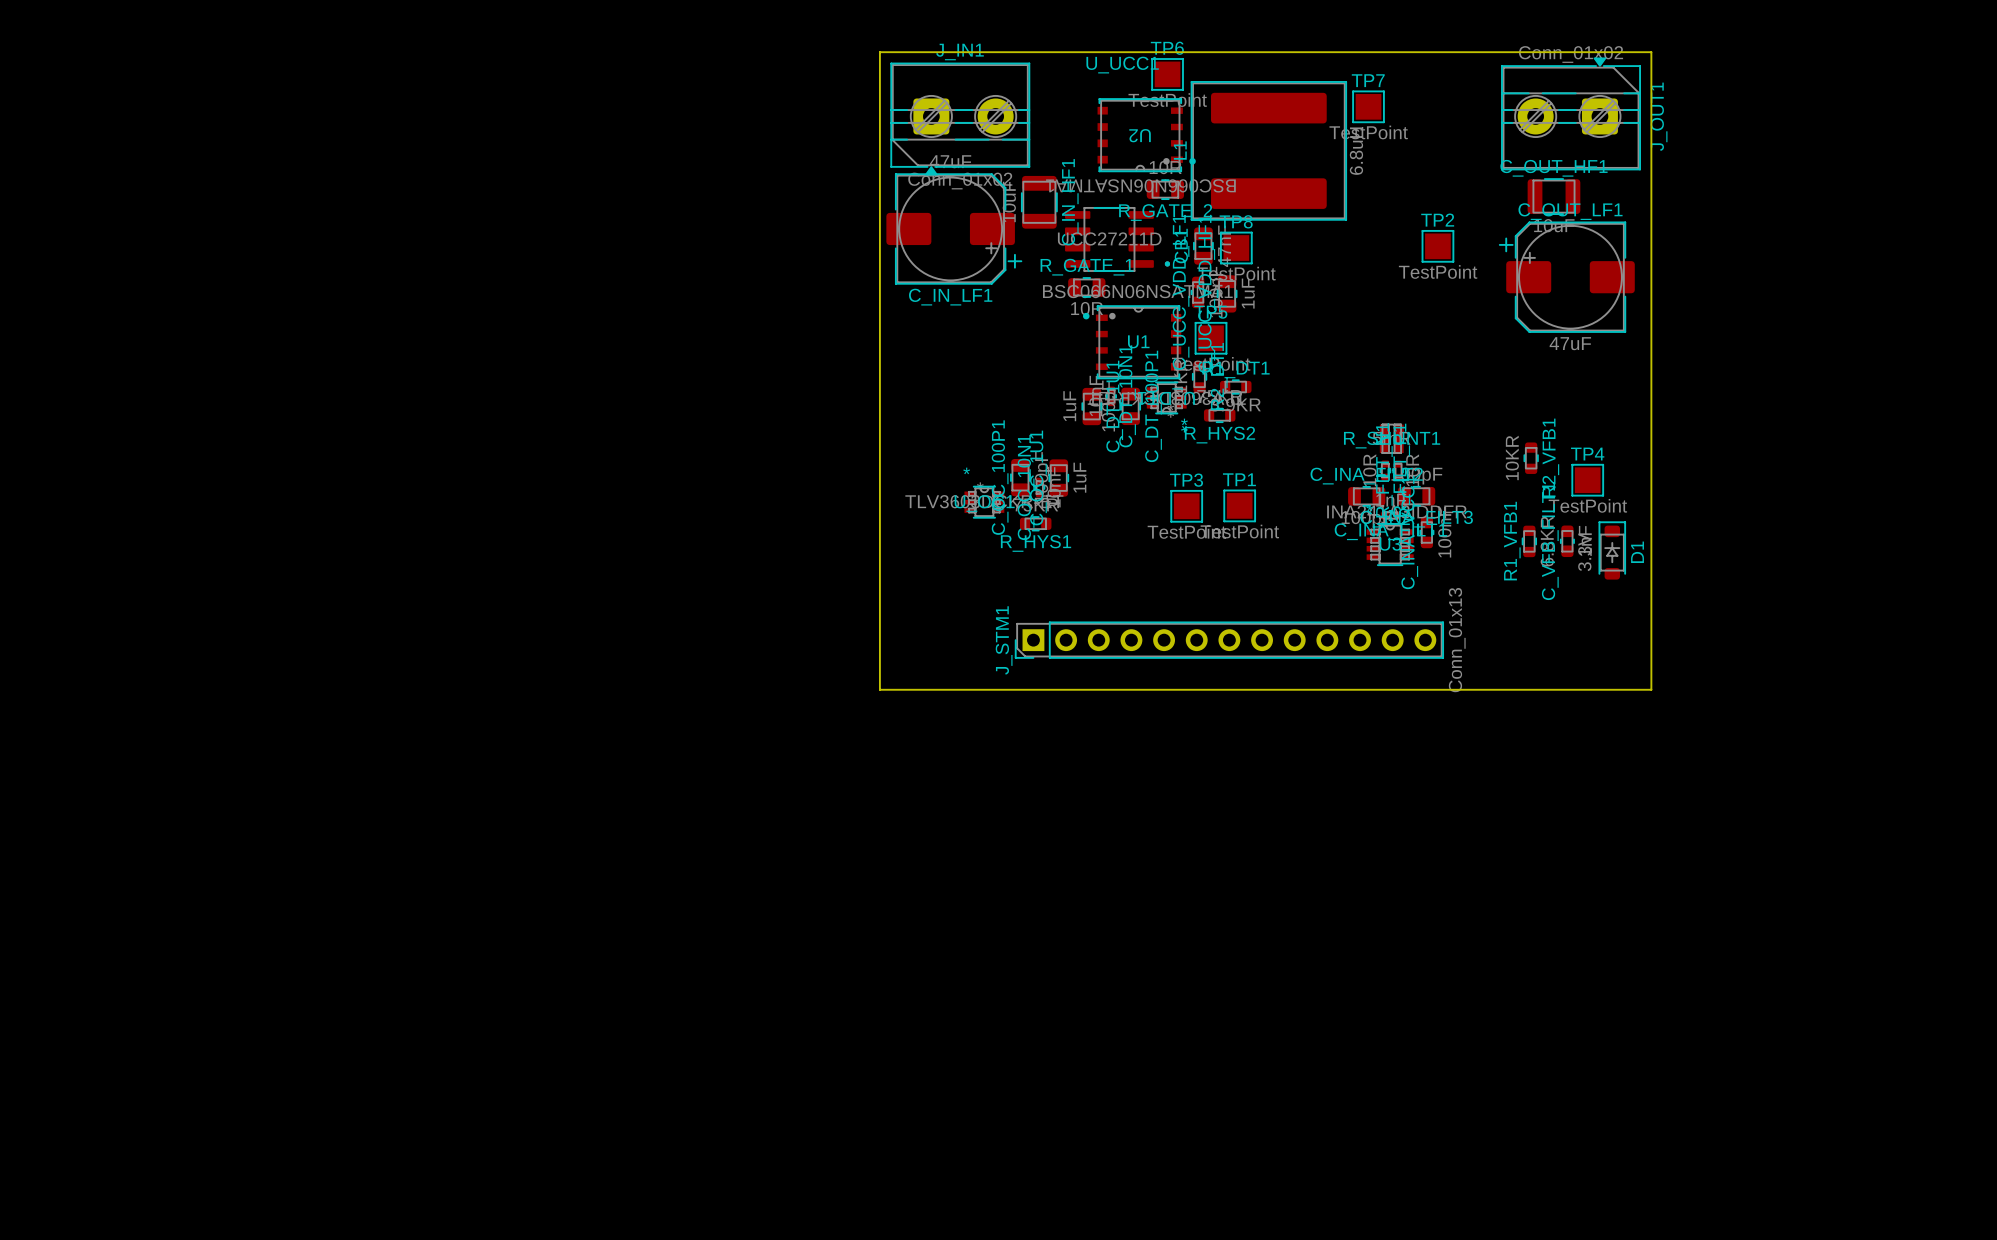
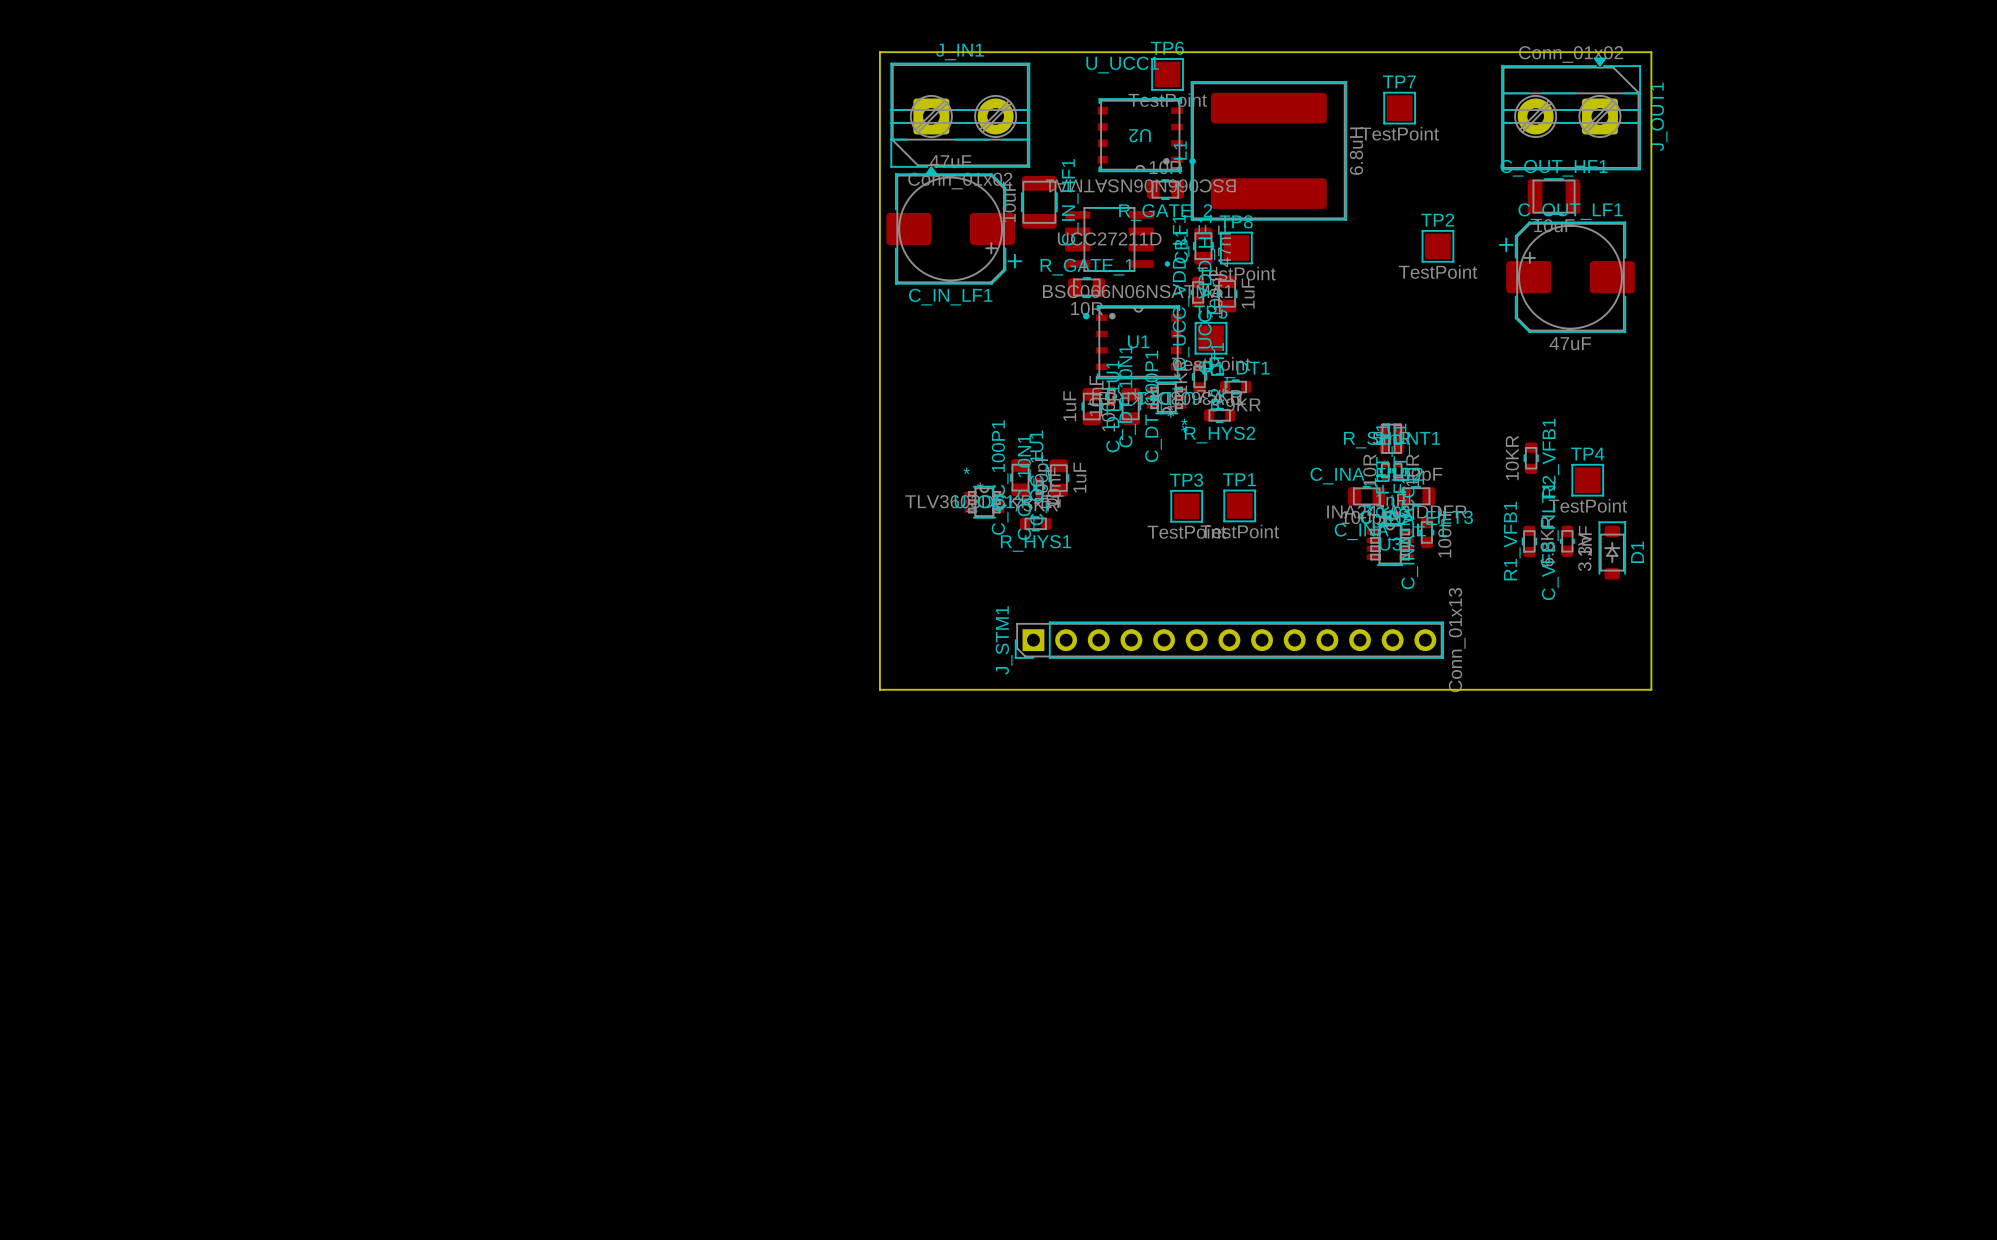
TP7 position: (1368, 106) -> (1399, 108)

